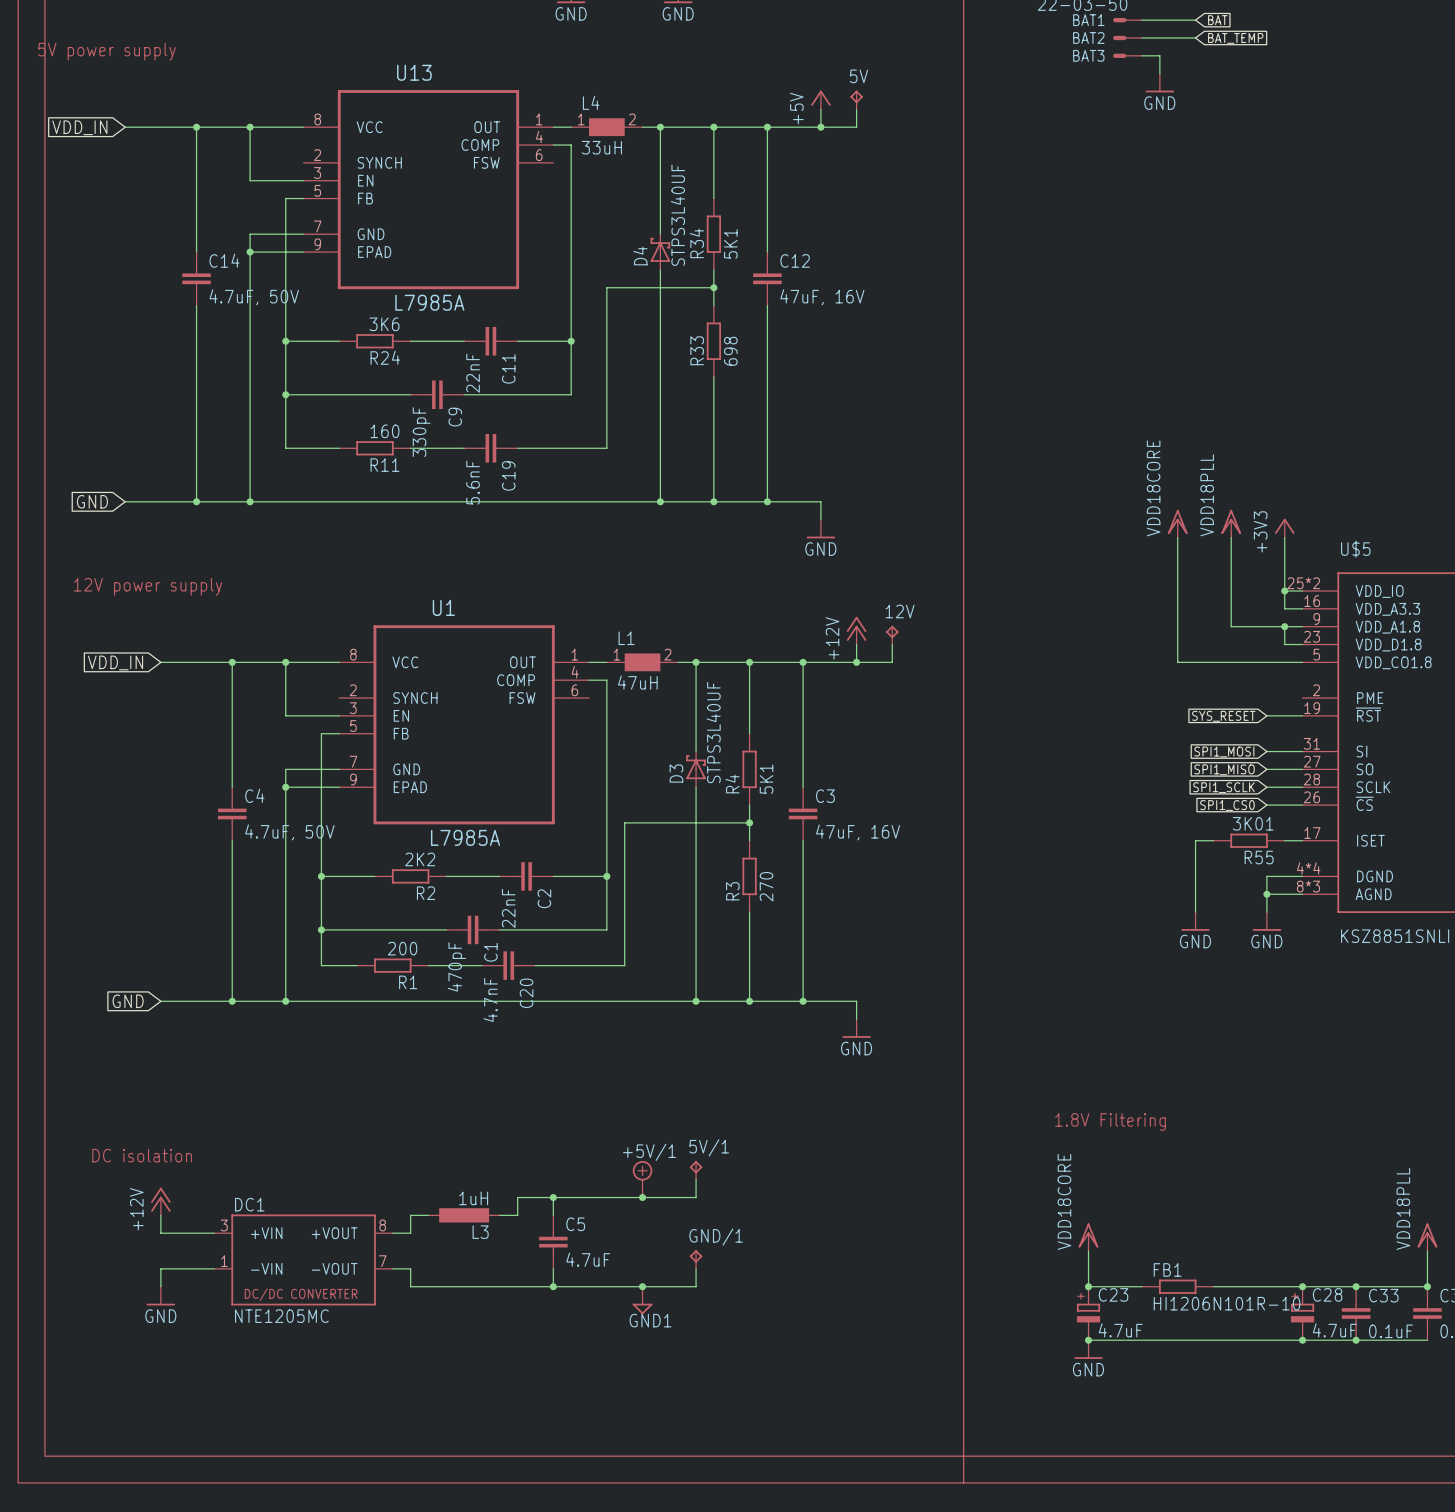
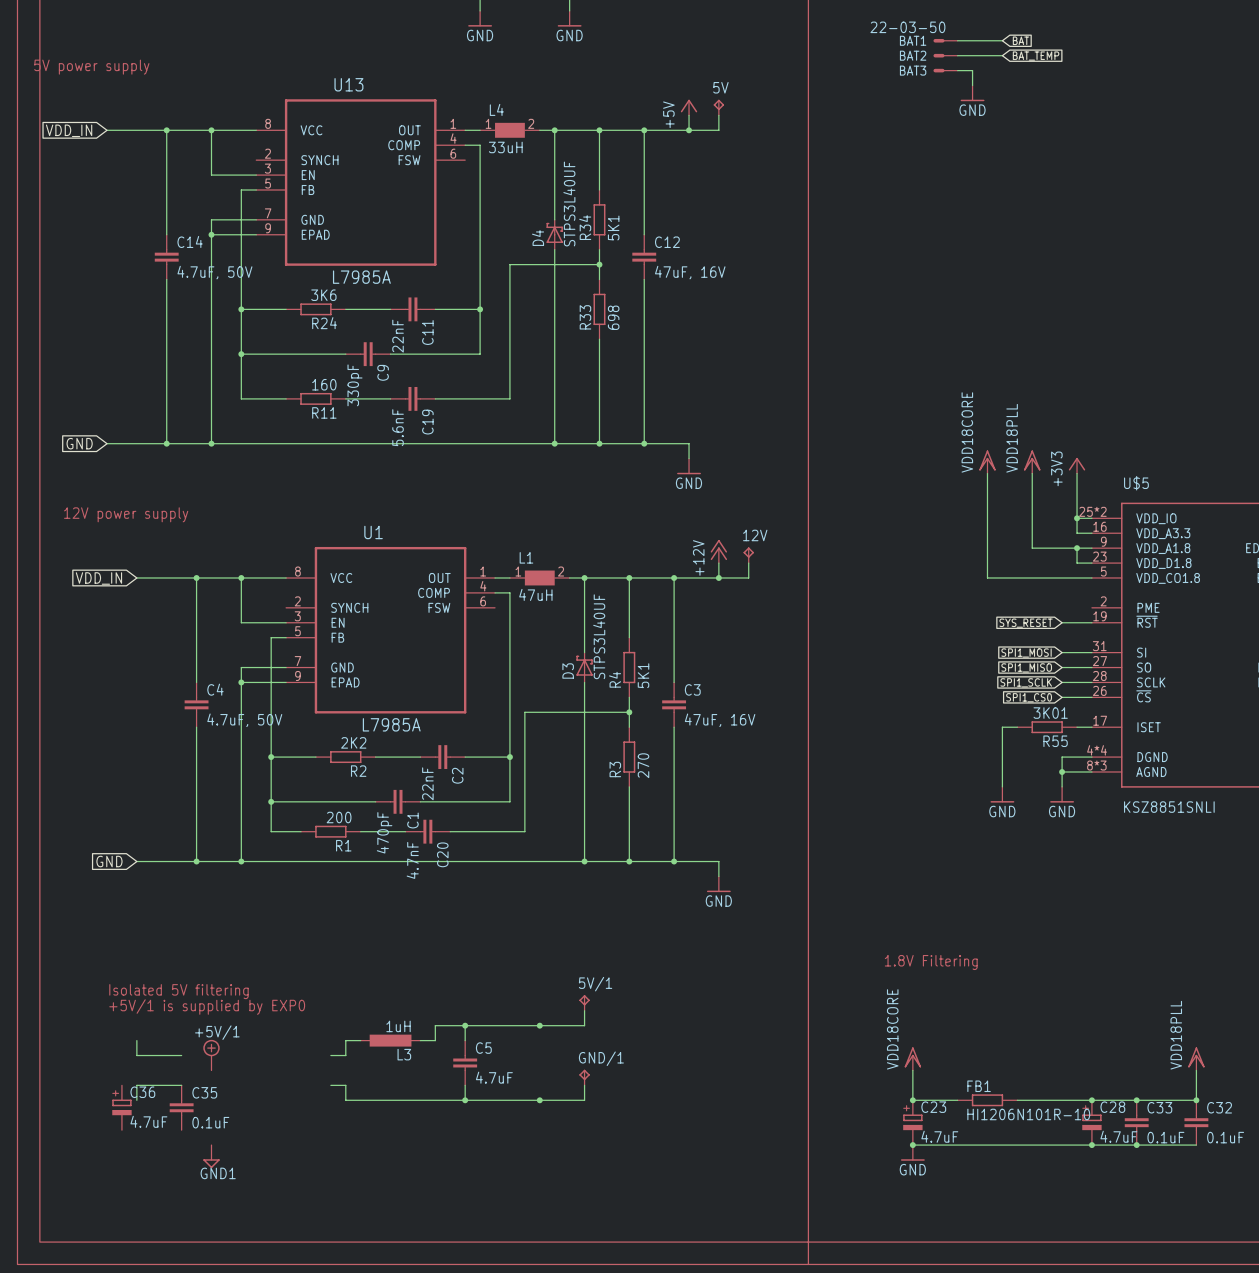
text: DC isolation (142, 1155) -> none
text: none -> Isolated 5V filtering (178, 991)
text: none -> +5V/1 is supplied by EXP0 (207, 1007)
power symbol: +5V/1 (642, 1179) -> none
power symbol: +12V (160, 1201) -> none
power symbol: none -> +5V/1 (211, 1055)
DC1: NTE1205MC (303, 1259) -> none
C36: none -> 4.7uF (121, 1107)
C35: none -> 0.1uF (181, 1107)
power symbol: GND (160, 1296) -> none
power symbol: GND1 (642, 1300) -> none
power symbol: none -> GND1 (211, 1156)

